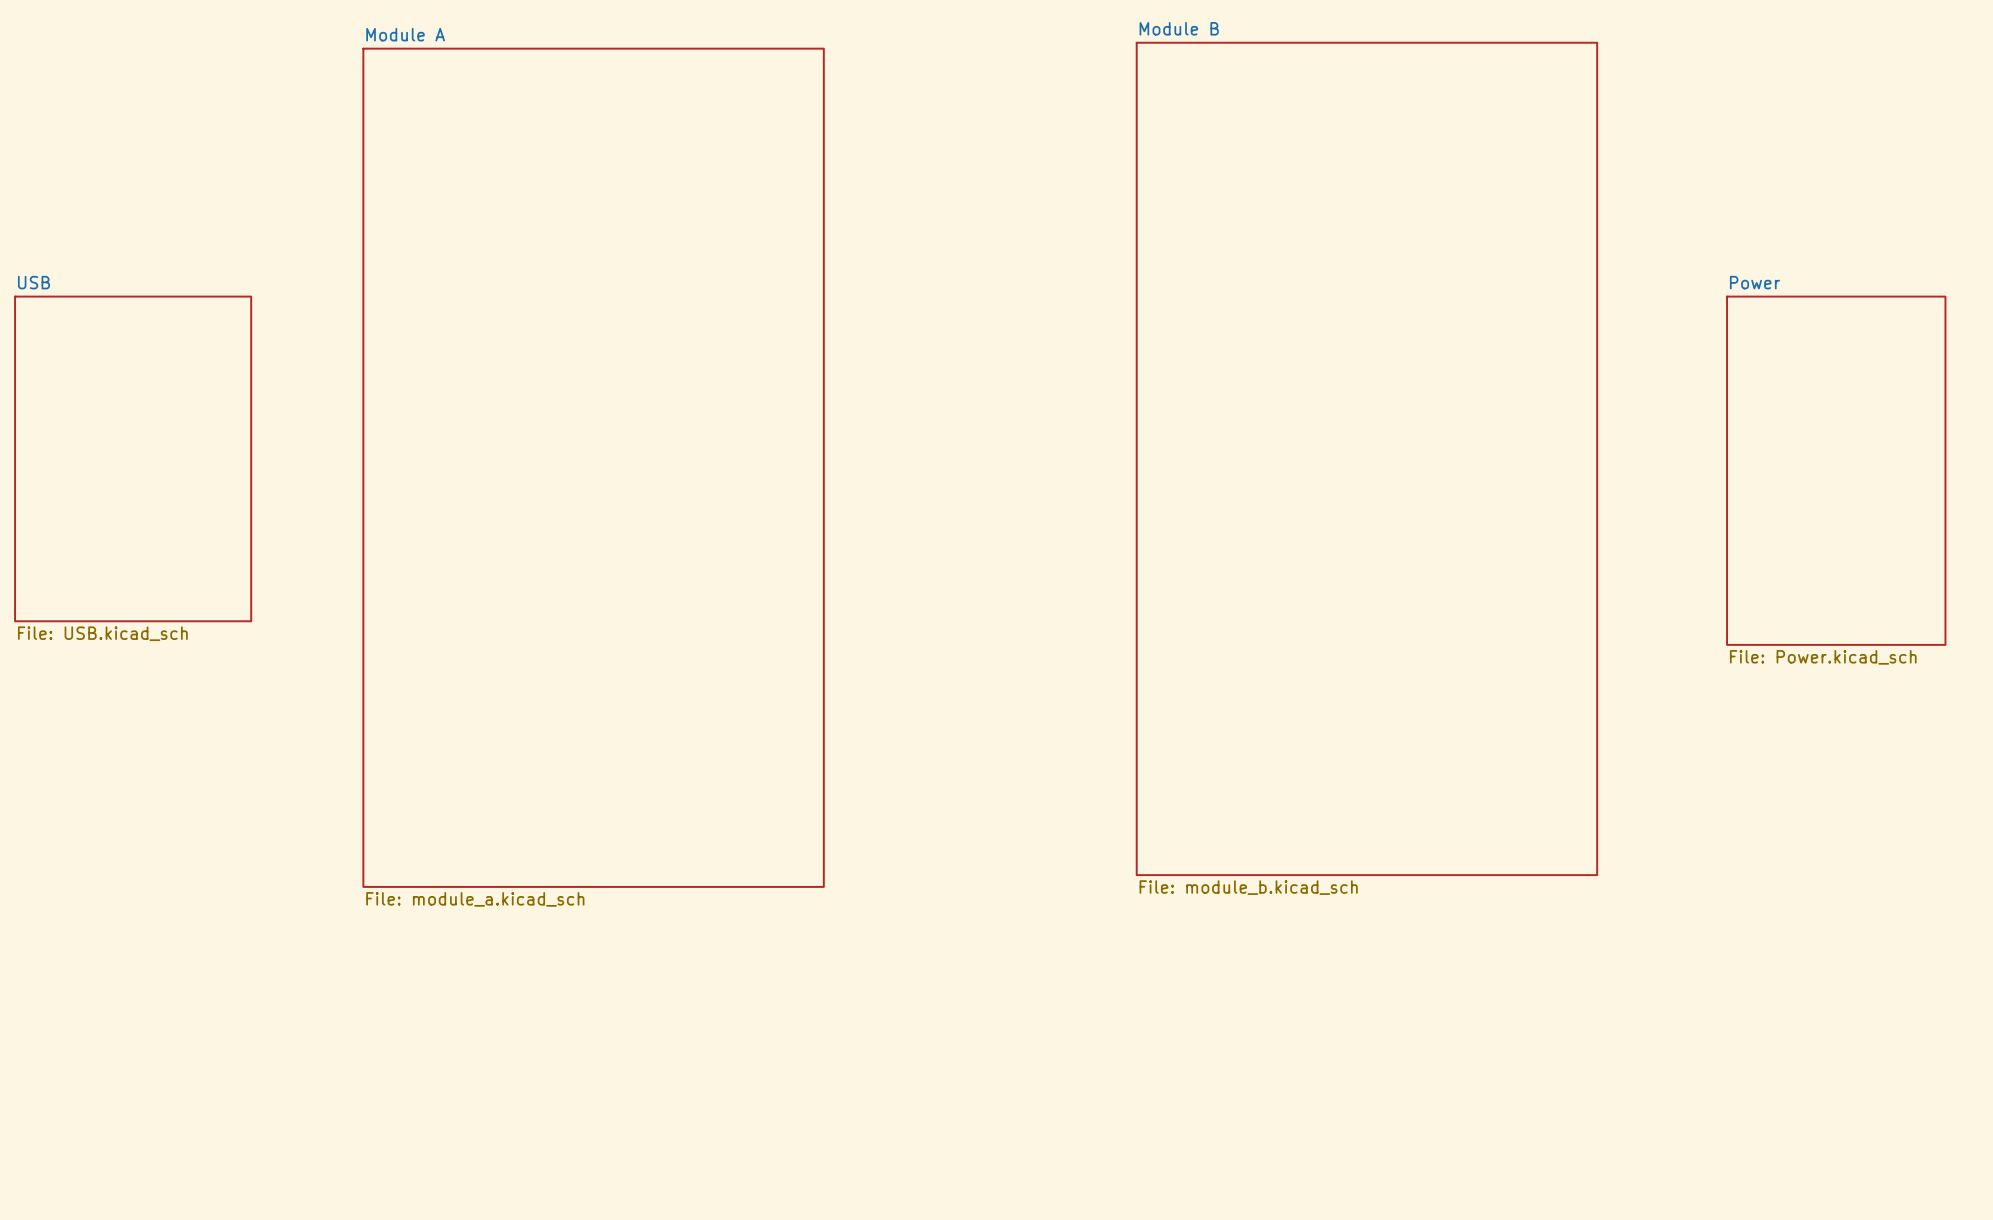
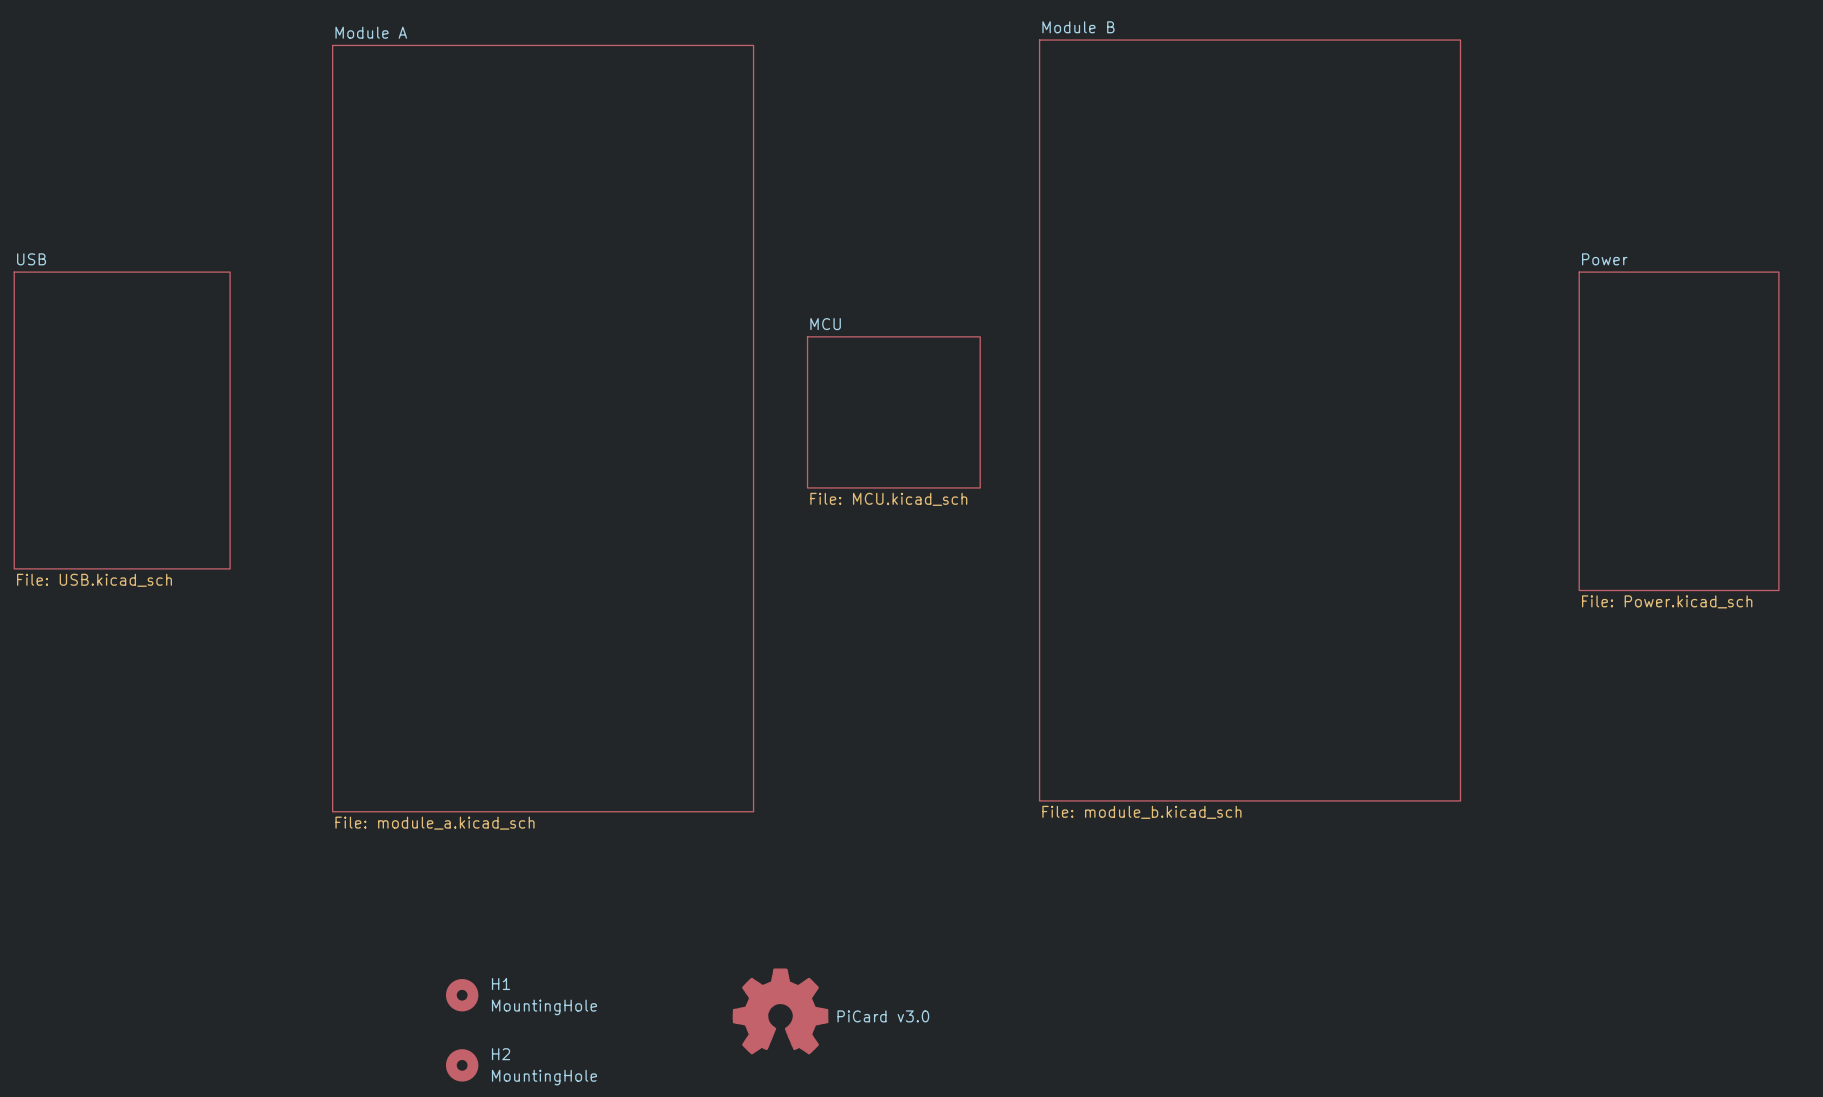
sheet MCU: none -> File: MCU.kicad_sch (893, 412)
H1: none -> MountingHole (462, 995)
part: none -> PiCard v3.0 (780, 1011)
H2: none -> MountingHole (462, 1065)

